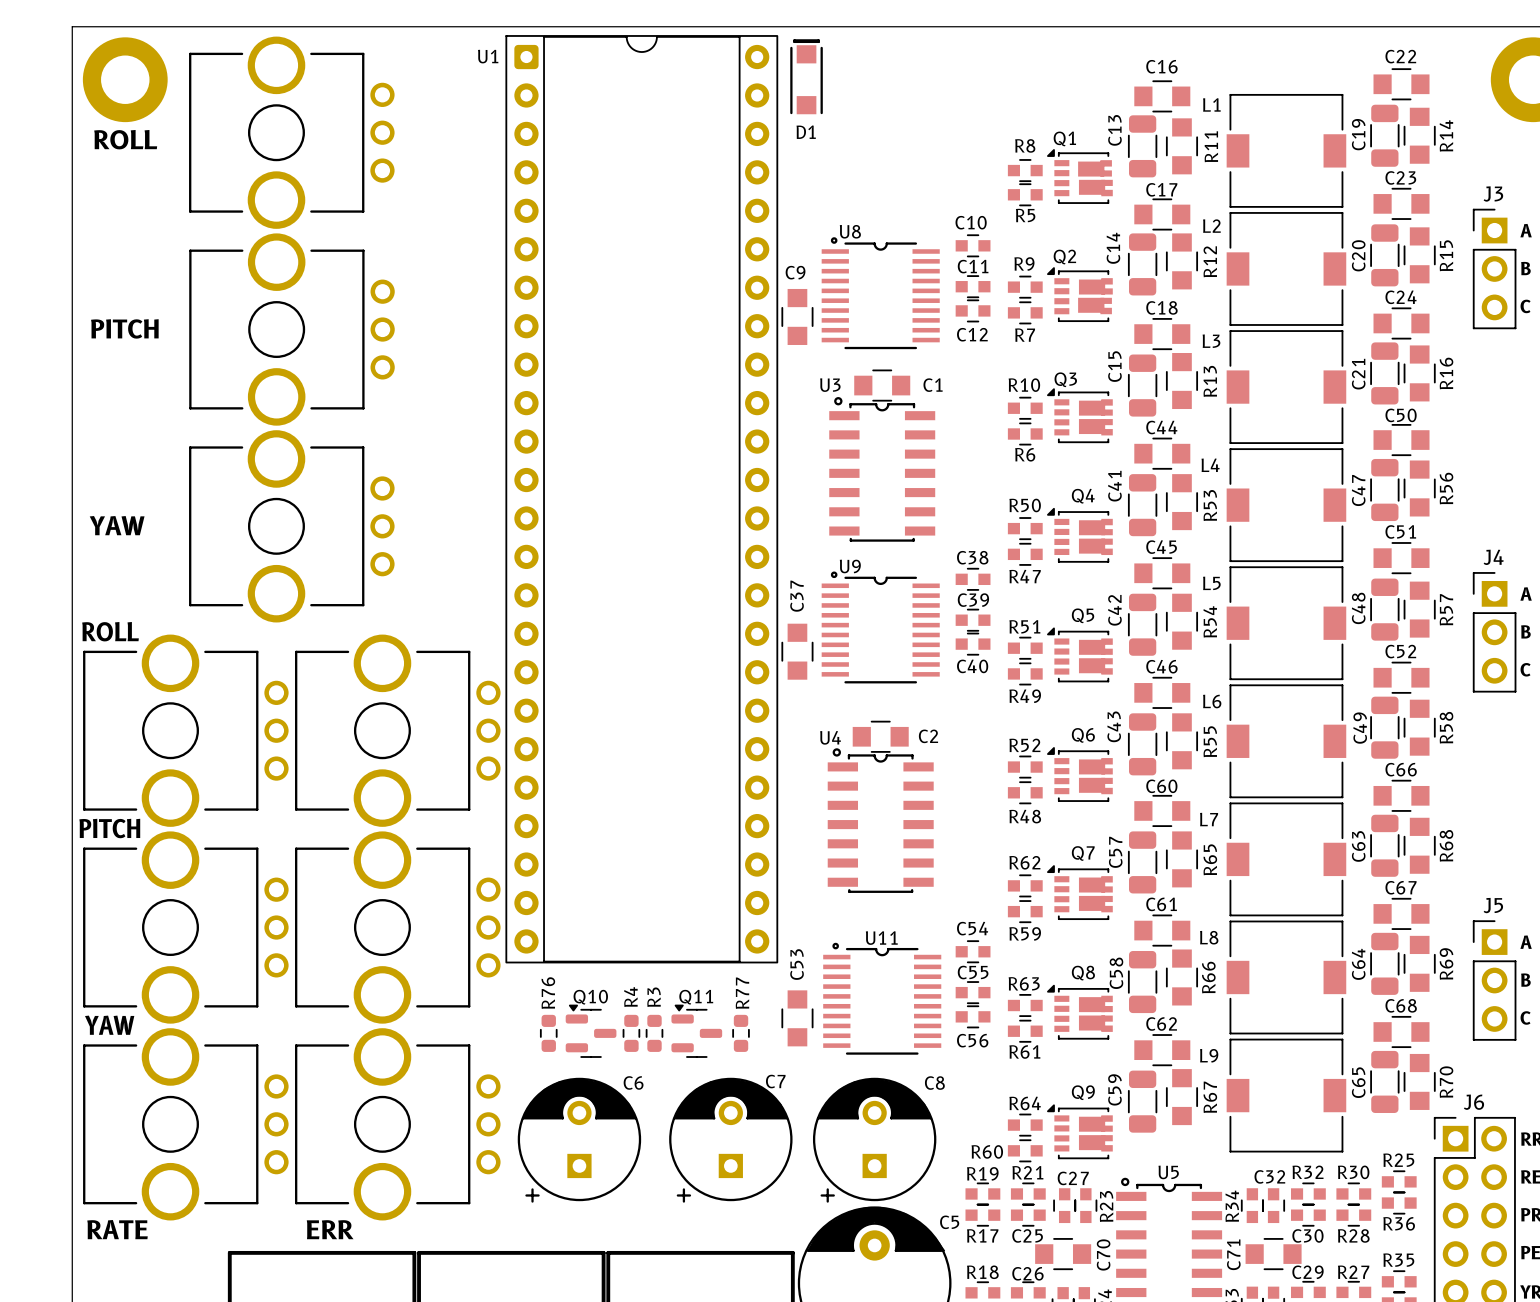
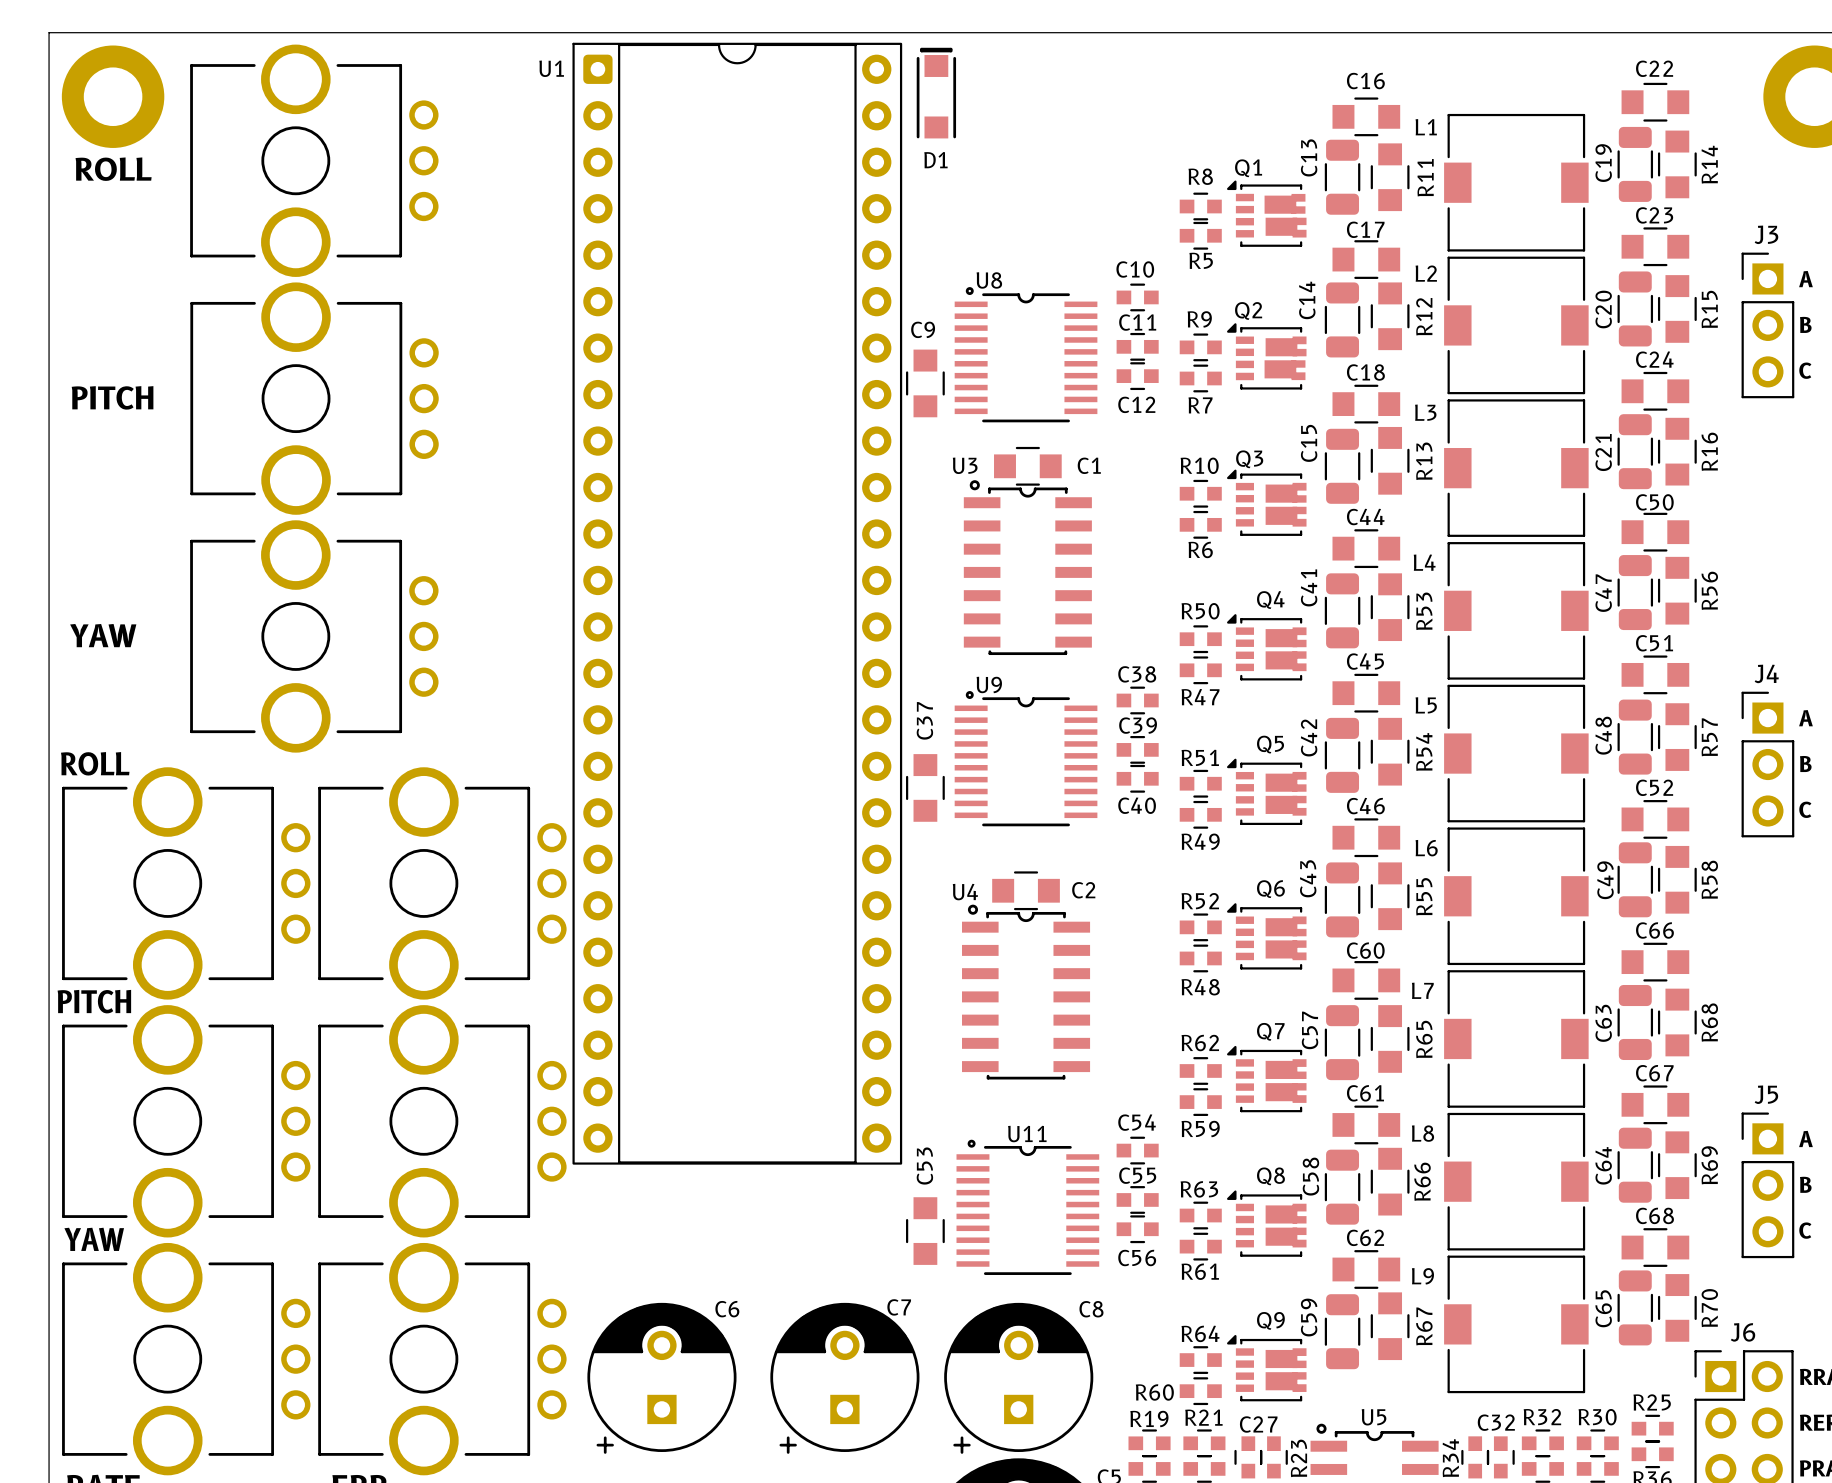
Q10: (591, 1031) -> none
Q11: (696, 1031) -> none
R76: (548, 1033) -> none
R4: (631, 1033) -> none
R3: (654, 1033) -> none
R77: (741, 1033) -> none

